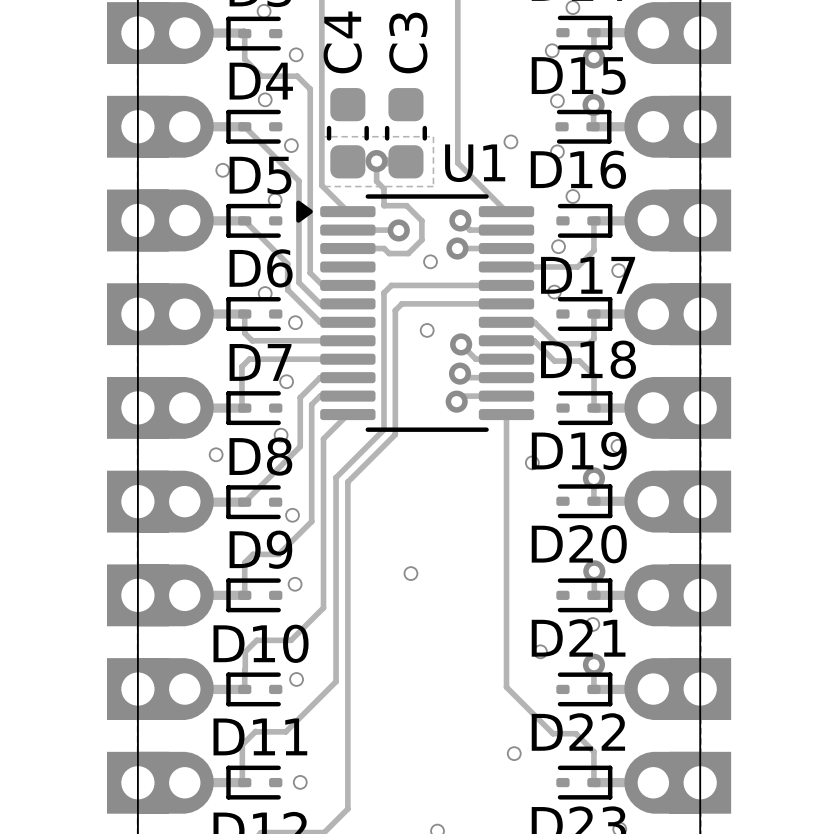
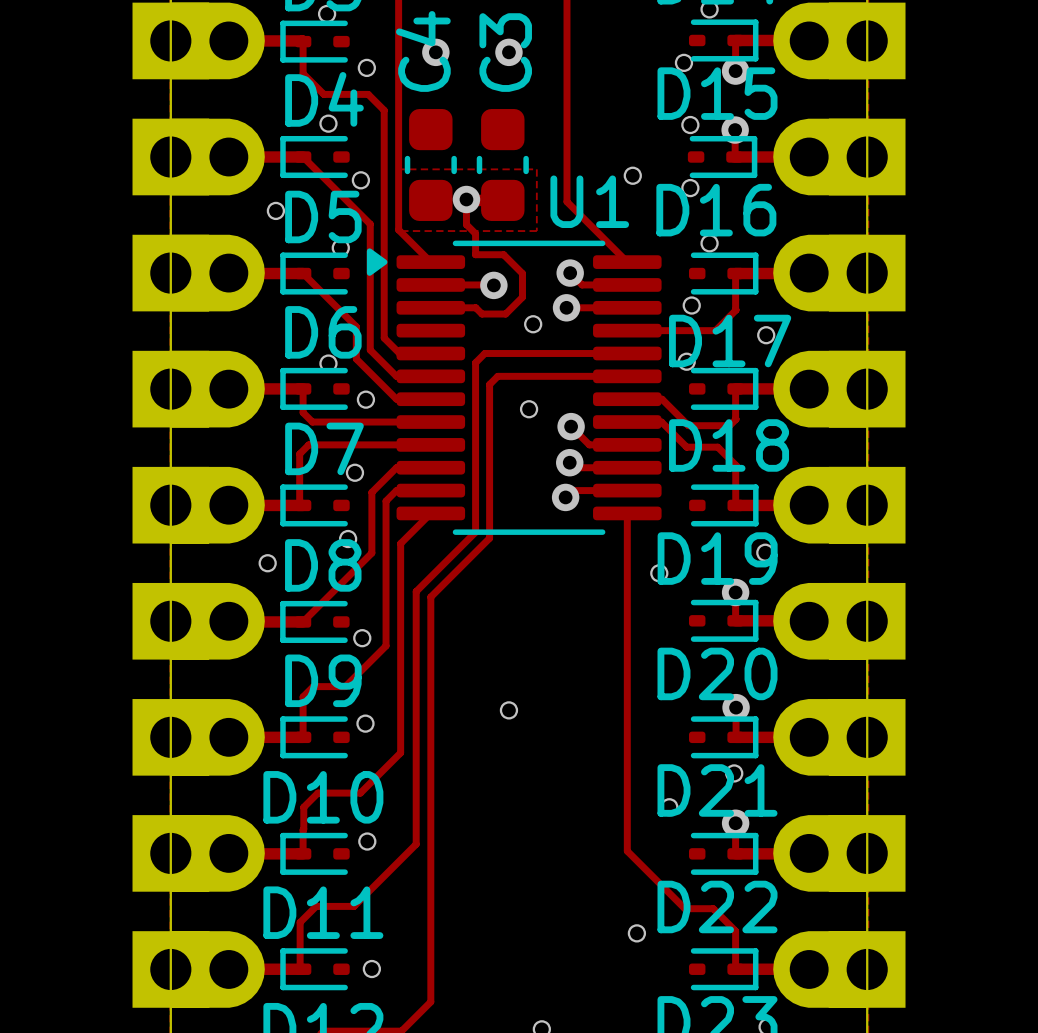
via: none -> (435, 52)
via: none -> (508, 52)

